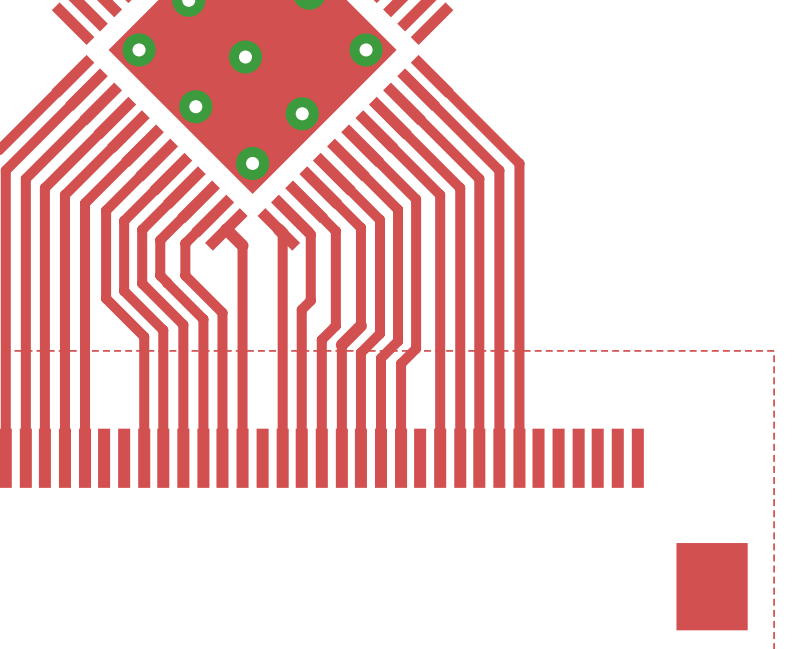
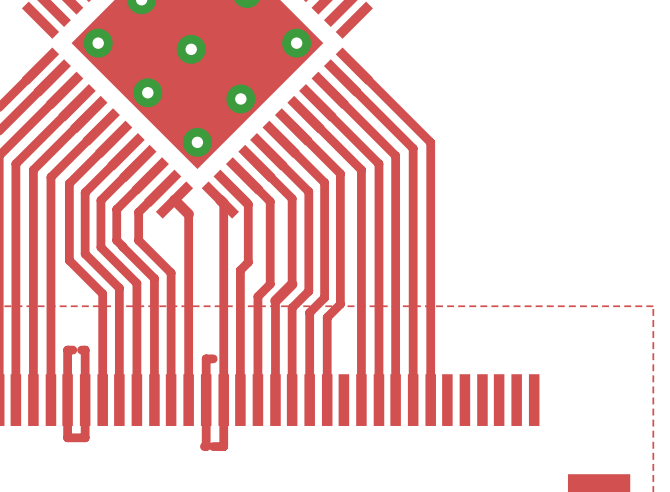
top track: none -> (81, 350) (85, 350) (85, 437) (67, 437) (67, 350) (72, 350)
top track: none -> (213, 358) (206, 358) (206, 446) (204, 446)
top track: none -> (223, 400) (223, 446) (213, 446)

